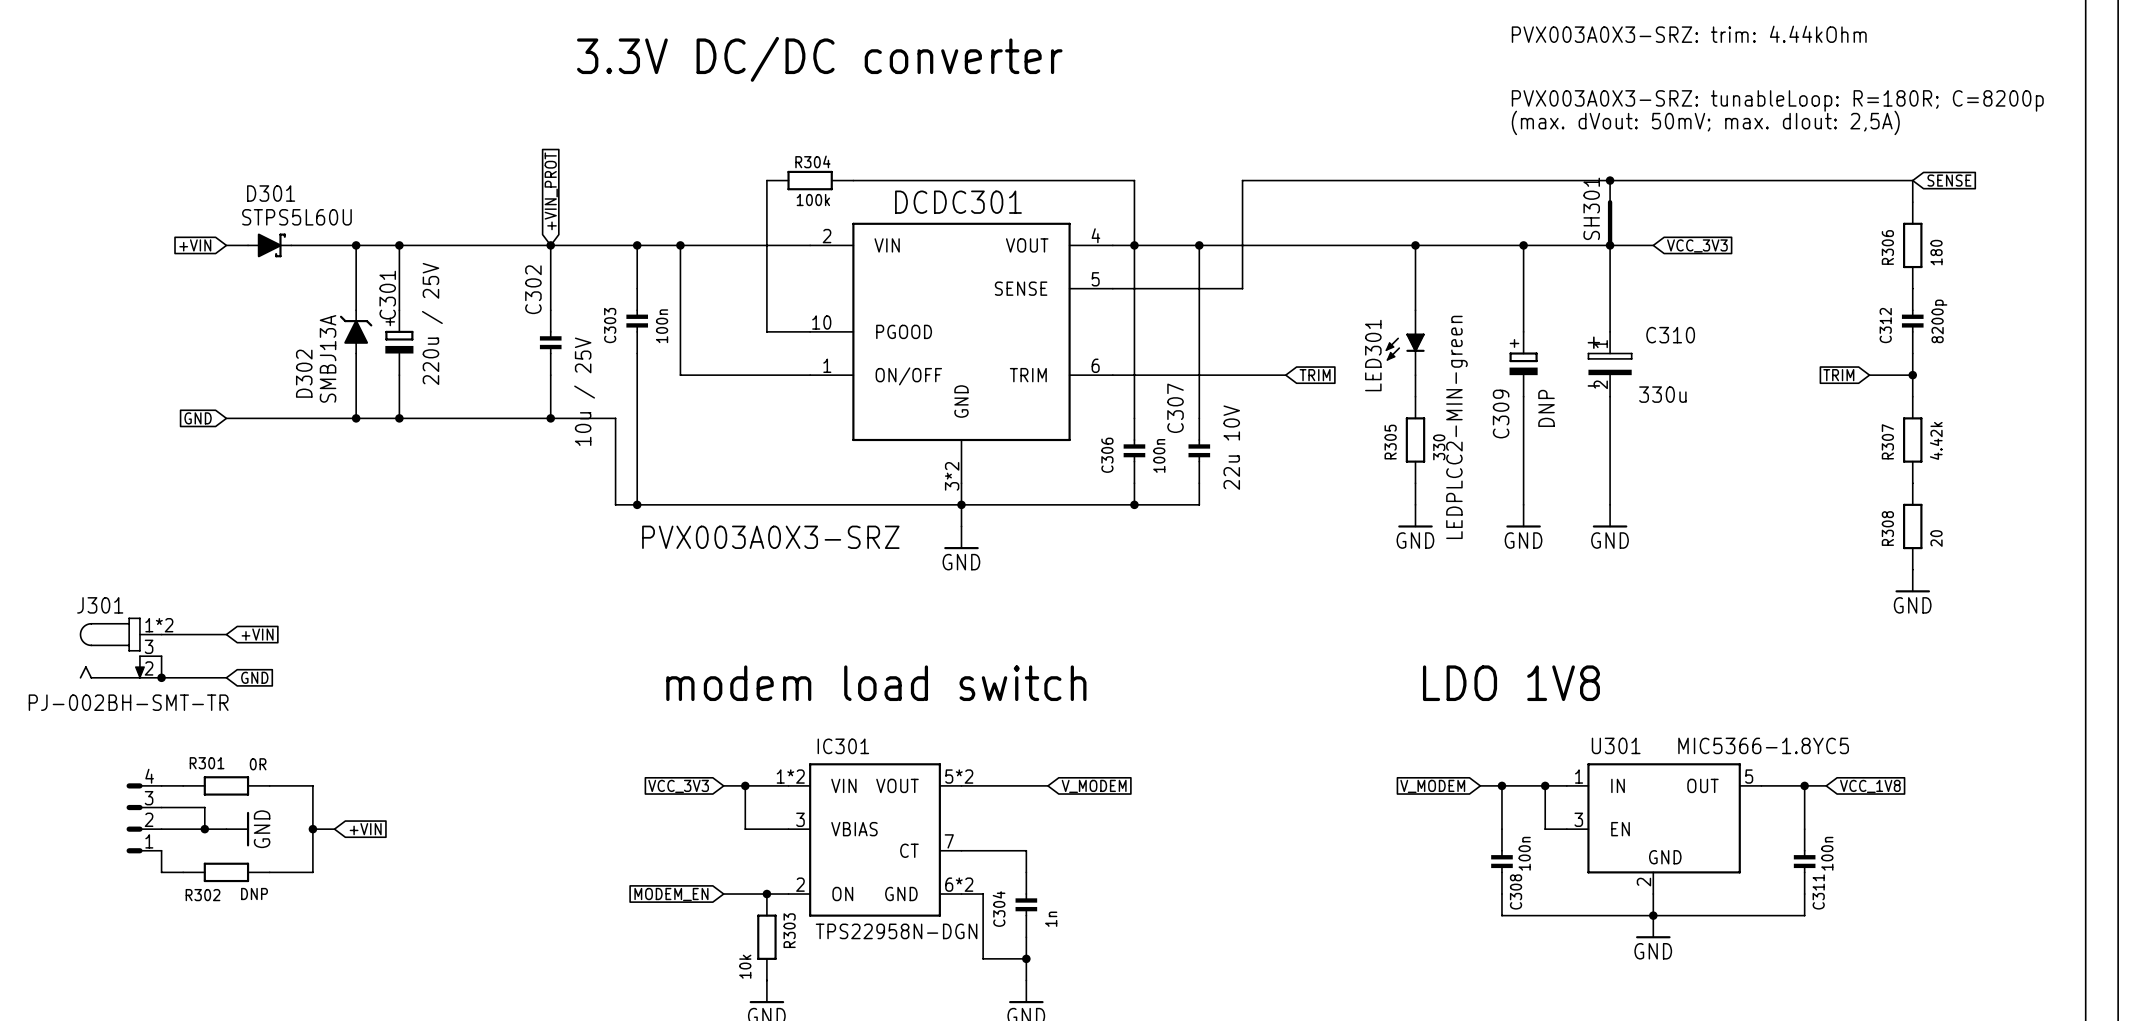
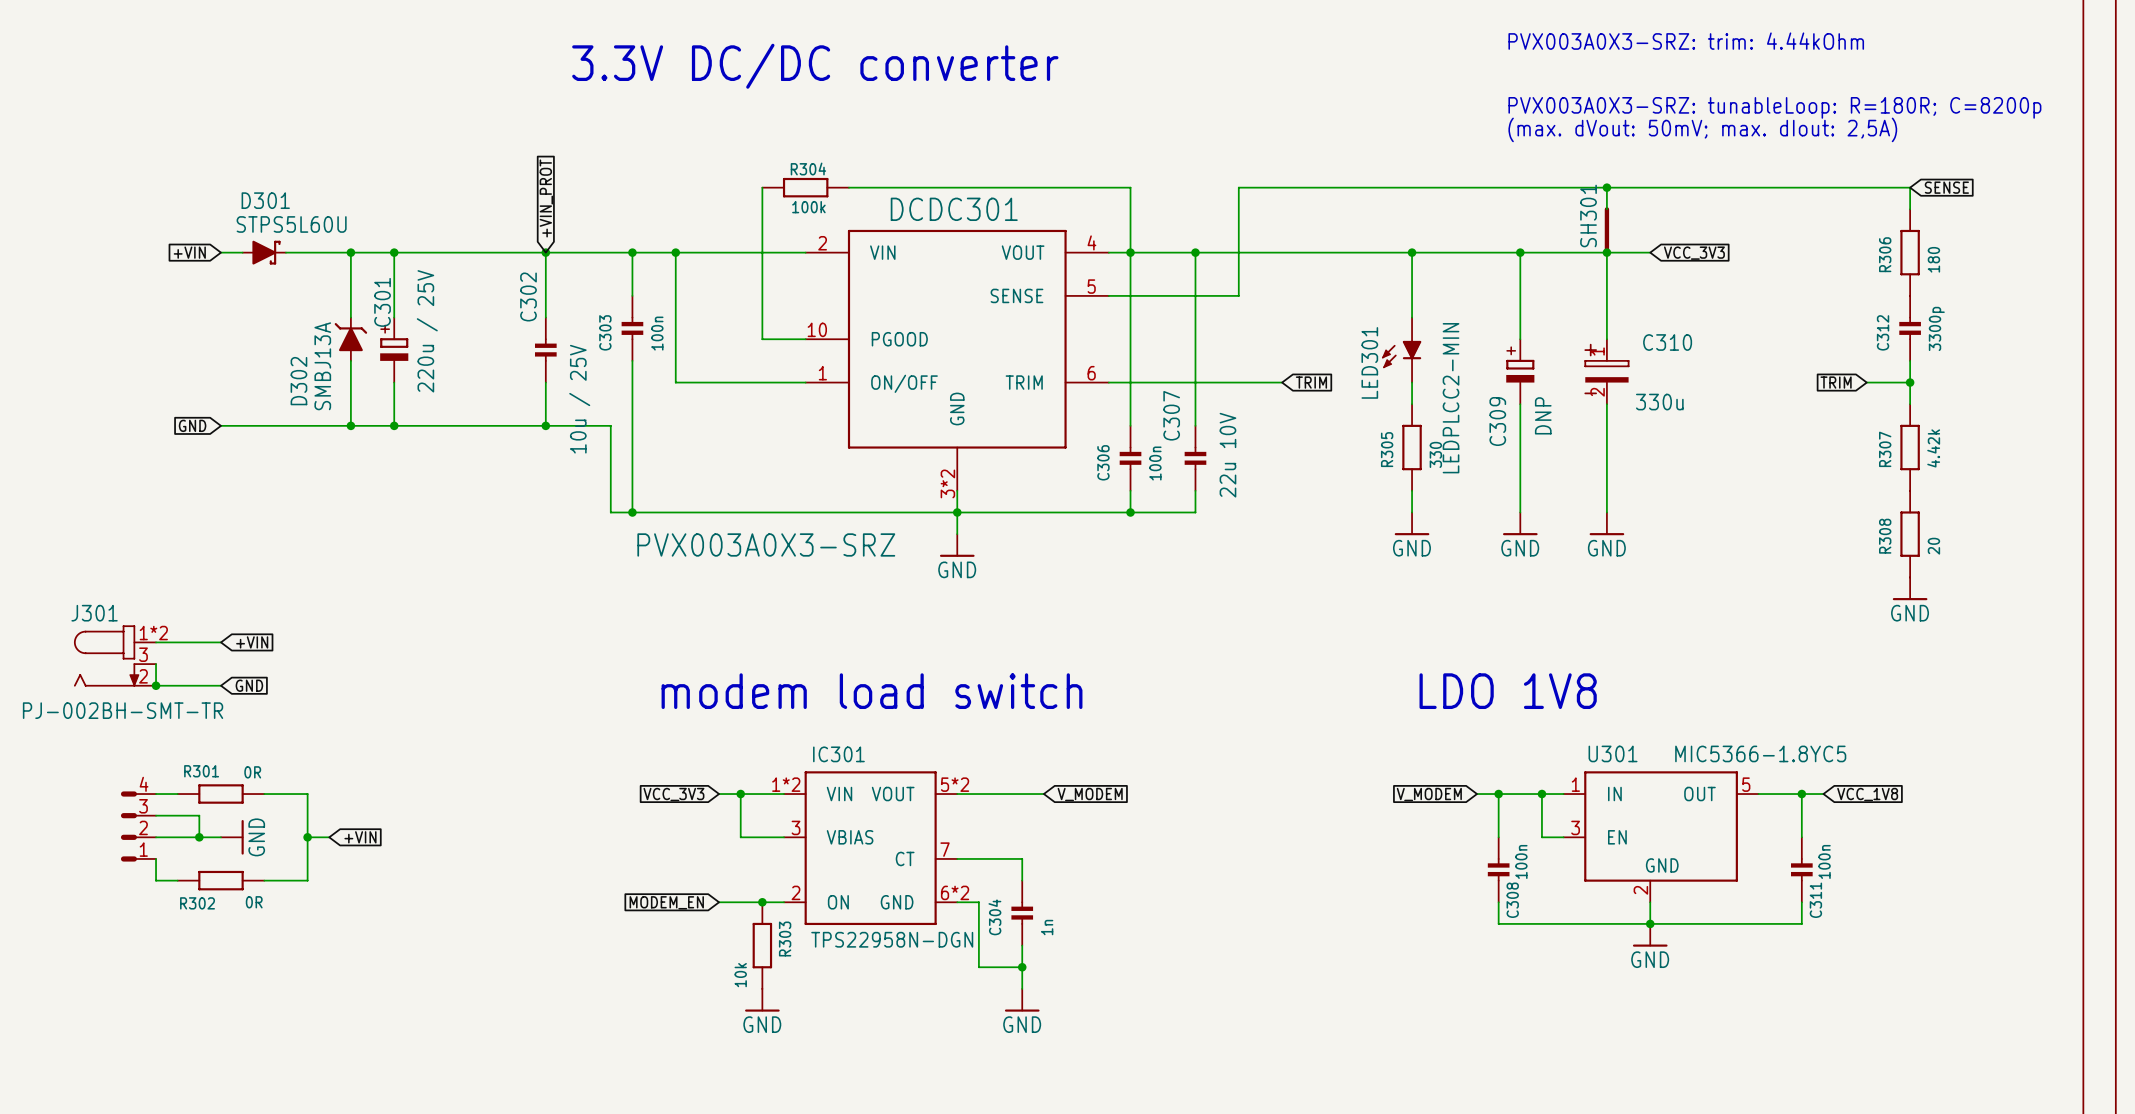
C312 value: 8200p (1939, 321) -> 3300p (1936, 328)
LED301 value: LEDPLCC2-MIN-green (1456, 427) -> LEDPLCC2-MIN (1451, 398)
R302 value: DNP (254, 894) -> 0R (254, 902)

